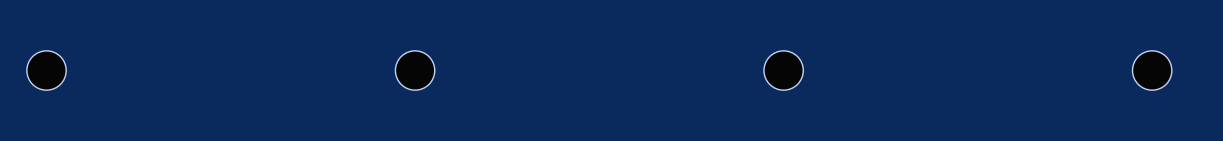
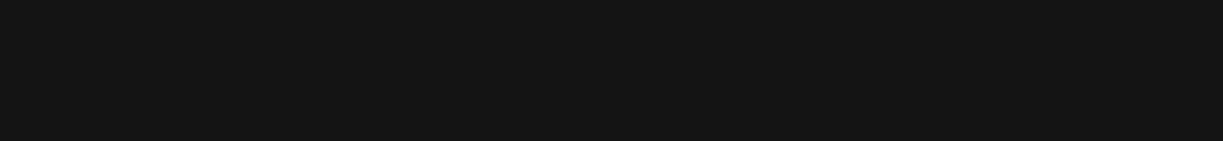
part: (46, 70) -> none
part: (415, 70) -> none
part: (783, 70) -> none
part: (1152, 70) -> none

